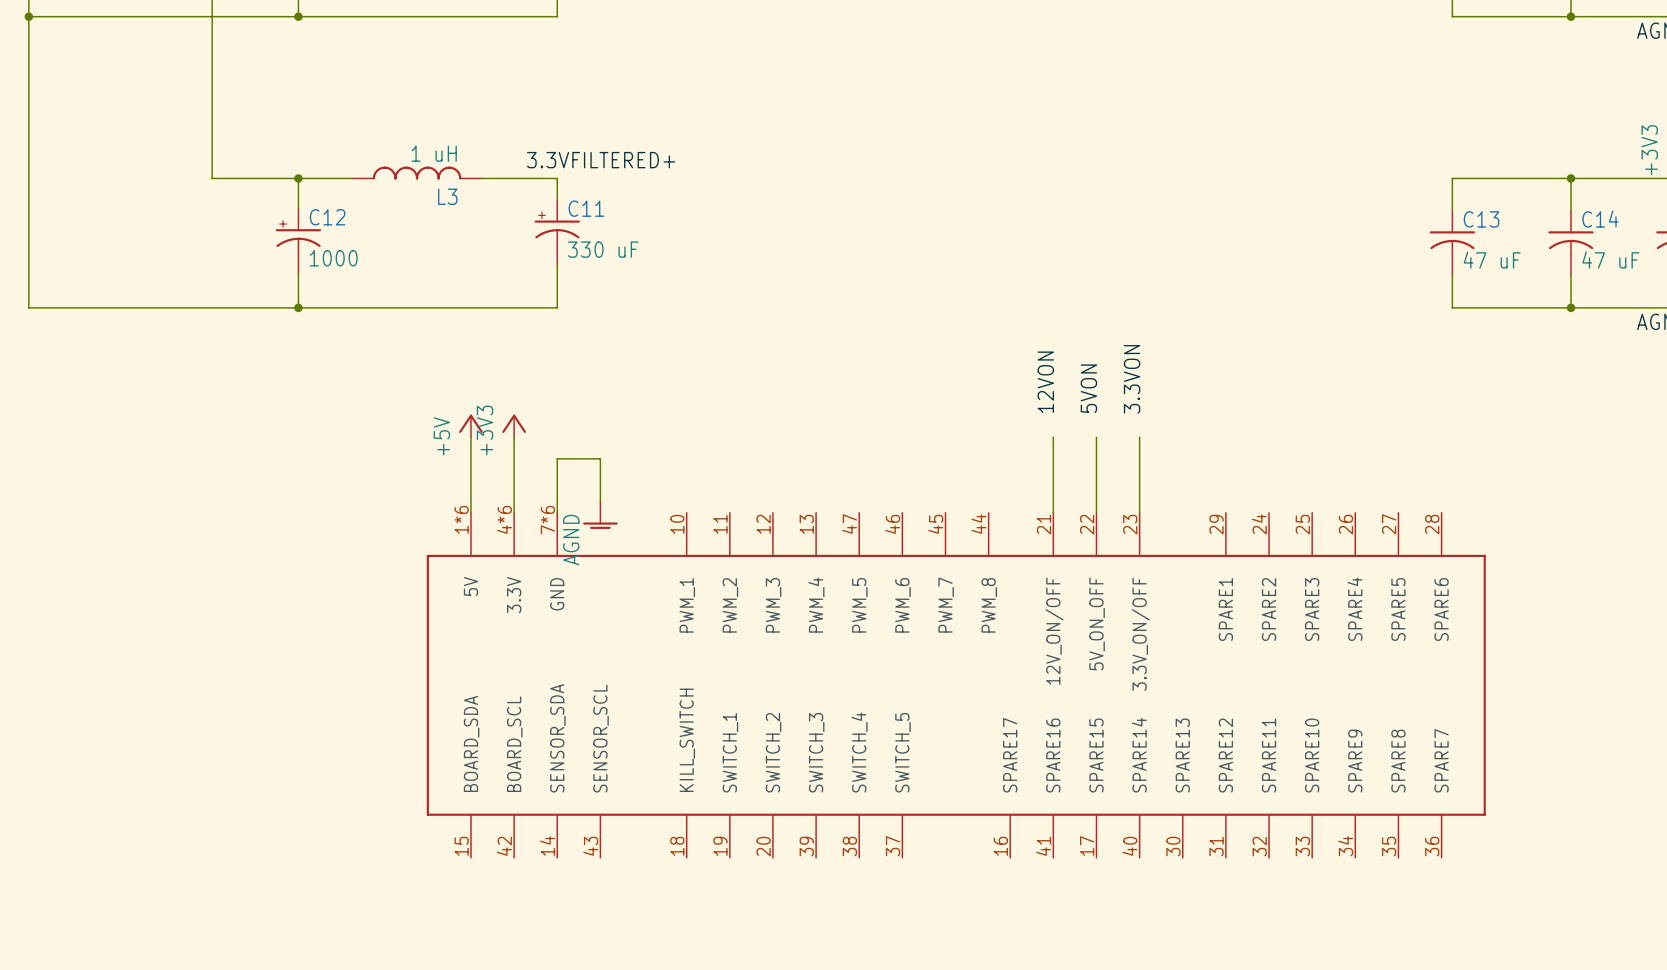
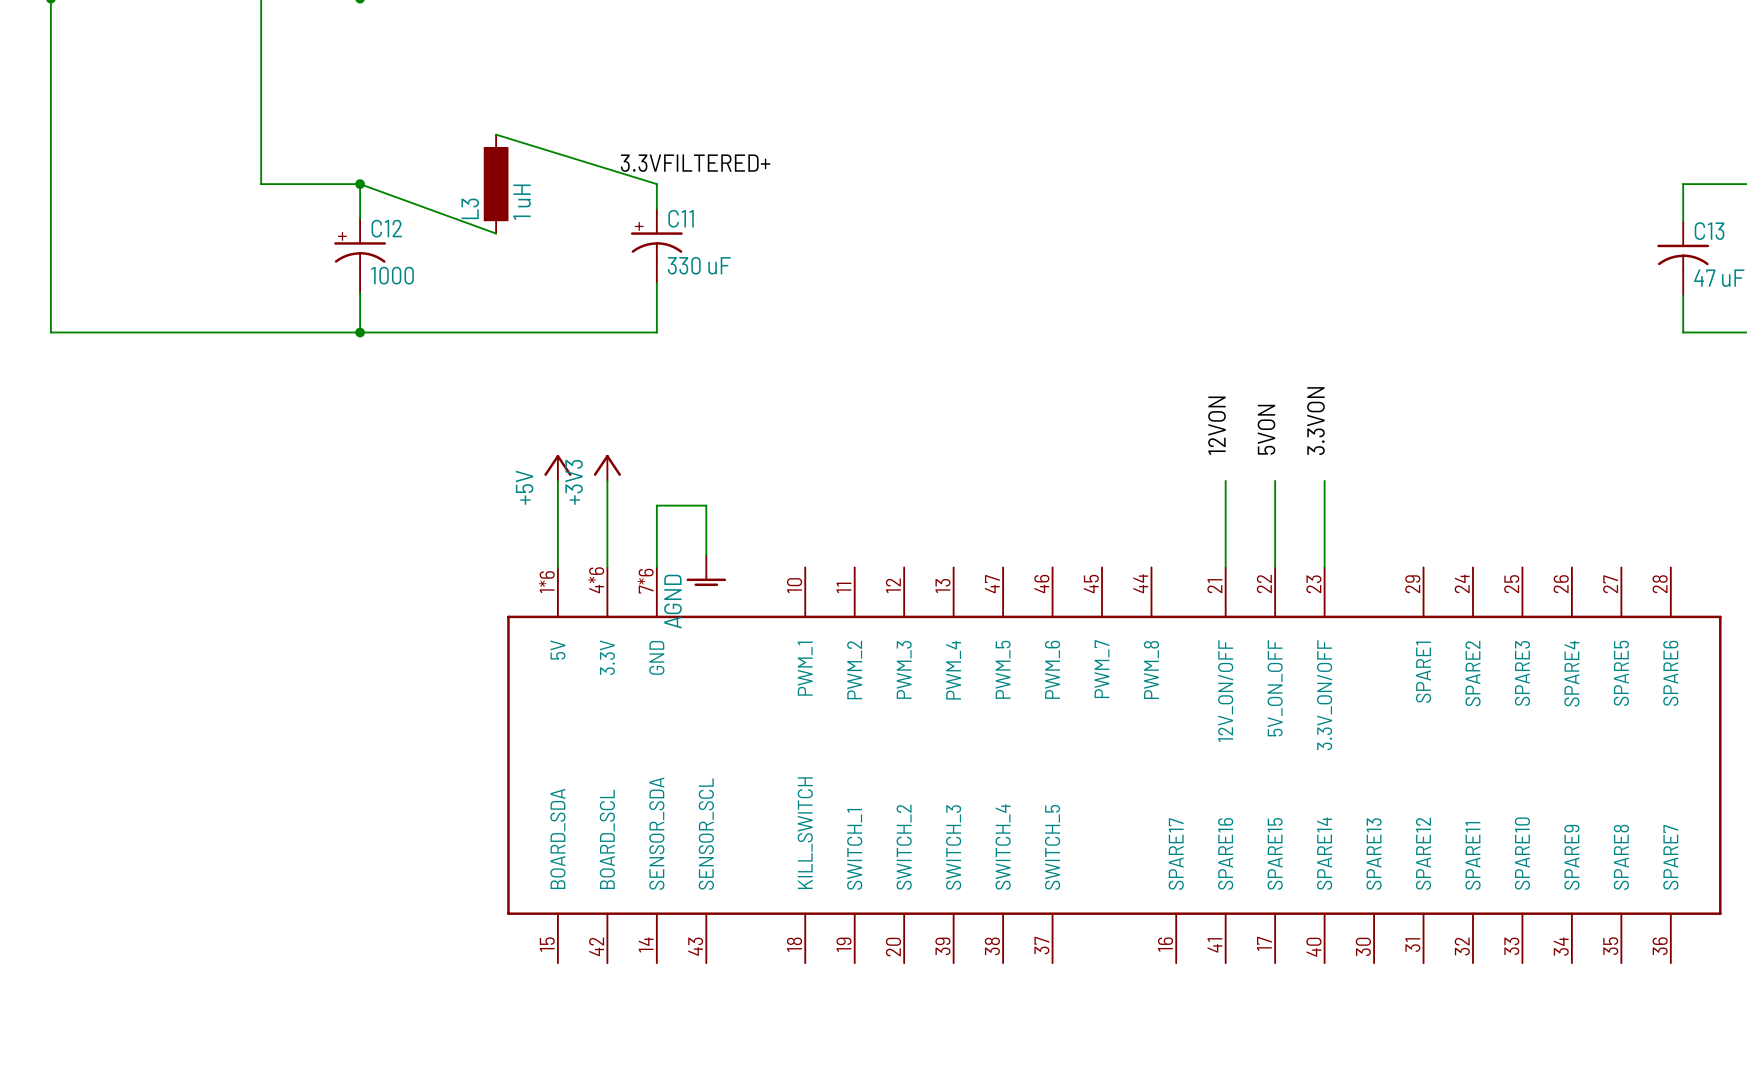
L3 value position: 1 uH (434, 153) -> 1 uH (522, 202)
L3 symbol: [352, 166, 482, 180] -> [483, 134, 509, 234]
wire: (298, 178) (352, 178) -> (360, 184) (496, 233)
wire: (481, 178) (557, 178) -> (496, 134) (656, 184)
L3 name position: L3 (447, 196) -> L3 (470, 208)

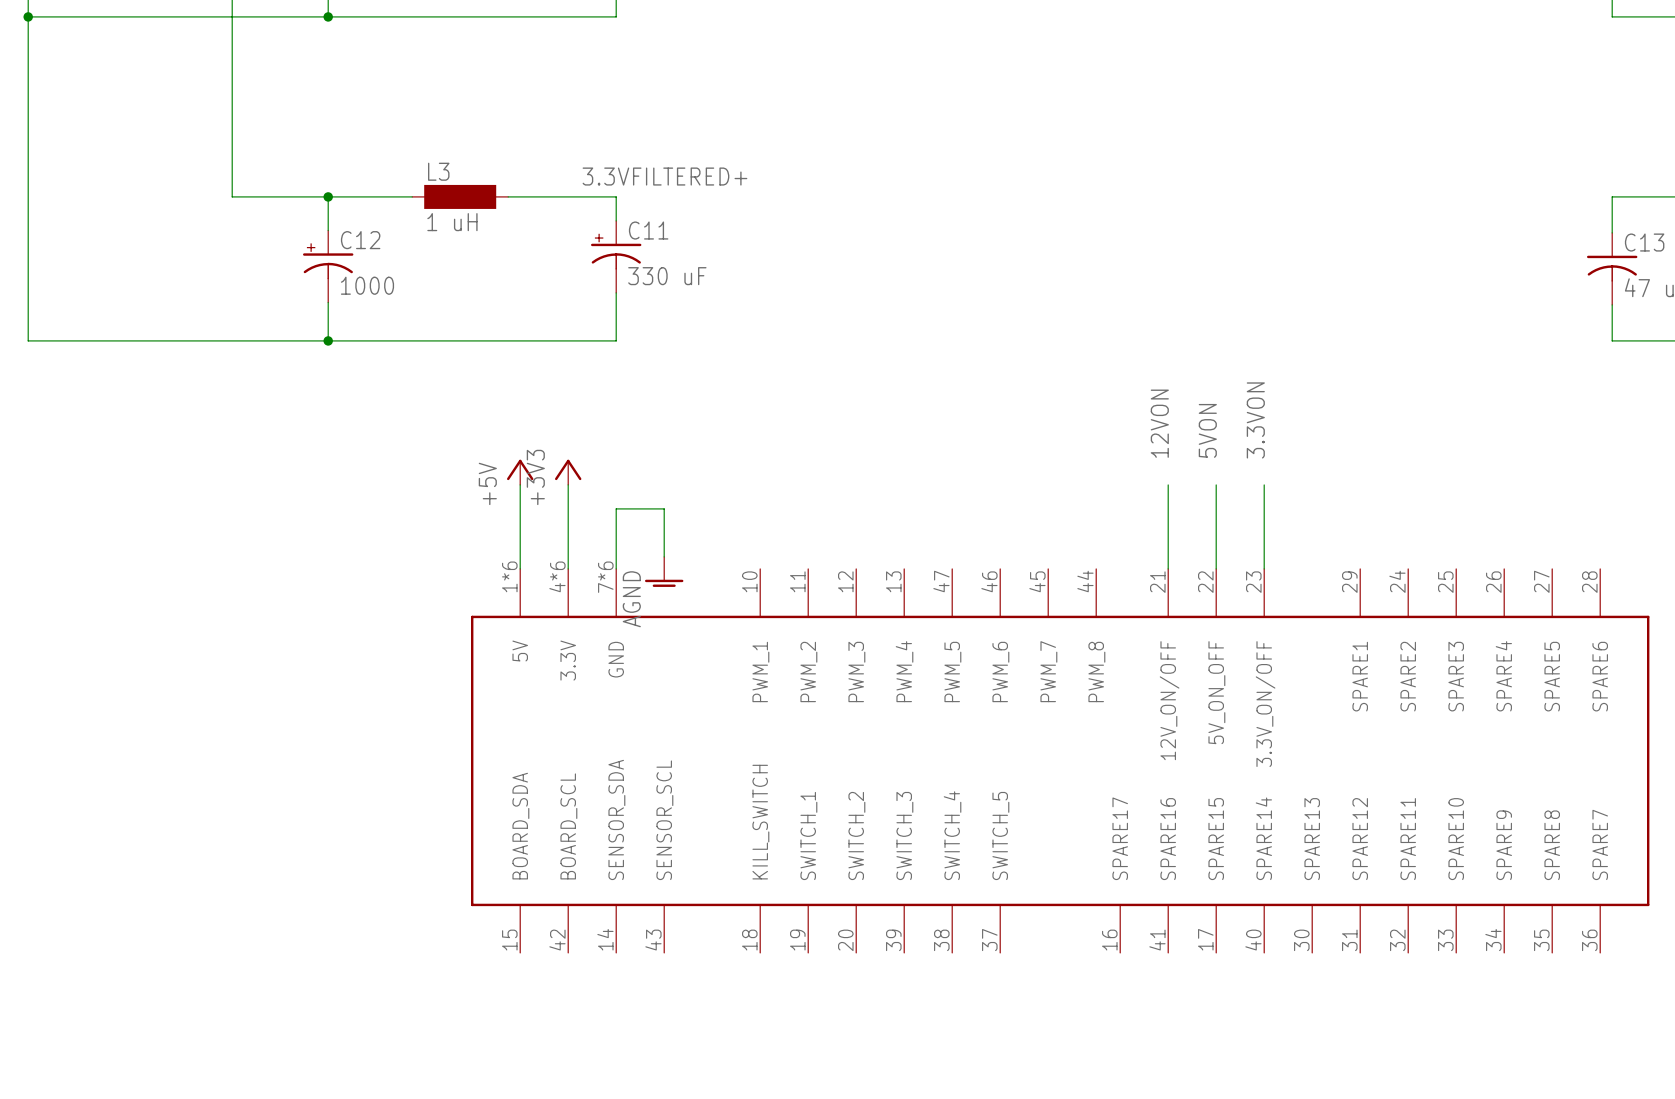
wire: (496, 134) (656, 184) -> (508, 196) (616, 196)
wire: (360, 184) (496, 233) -> (328, 196) (412, 196)
L3 rotation: 0° (496, 184) -> 90° clockwise (460, 196)

